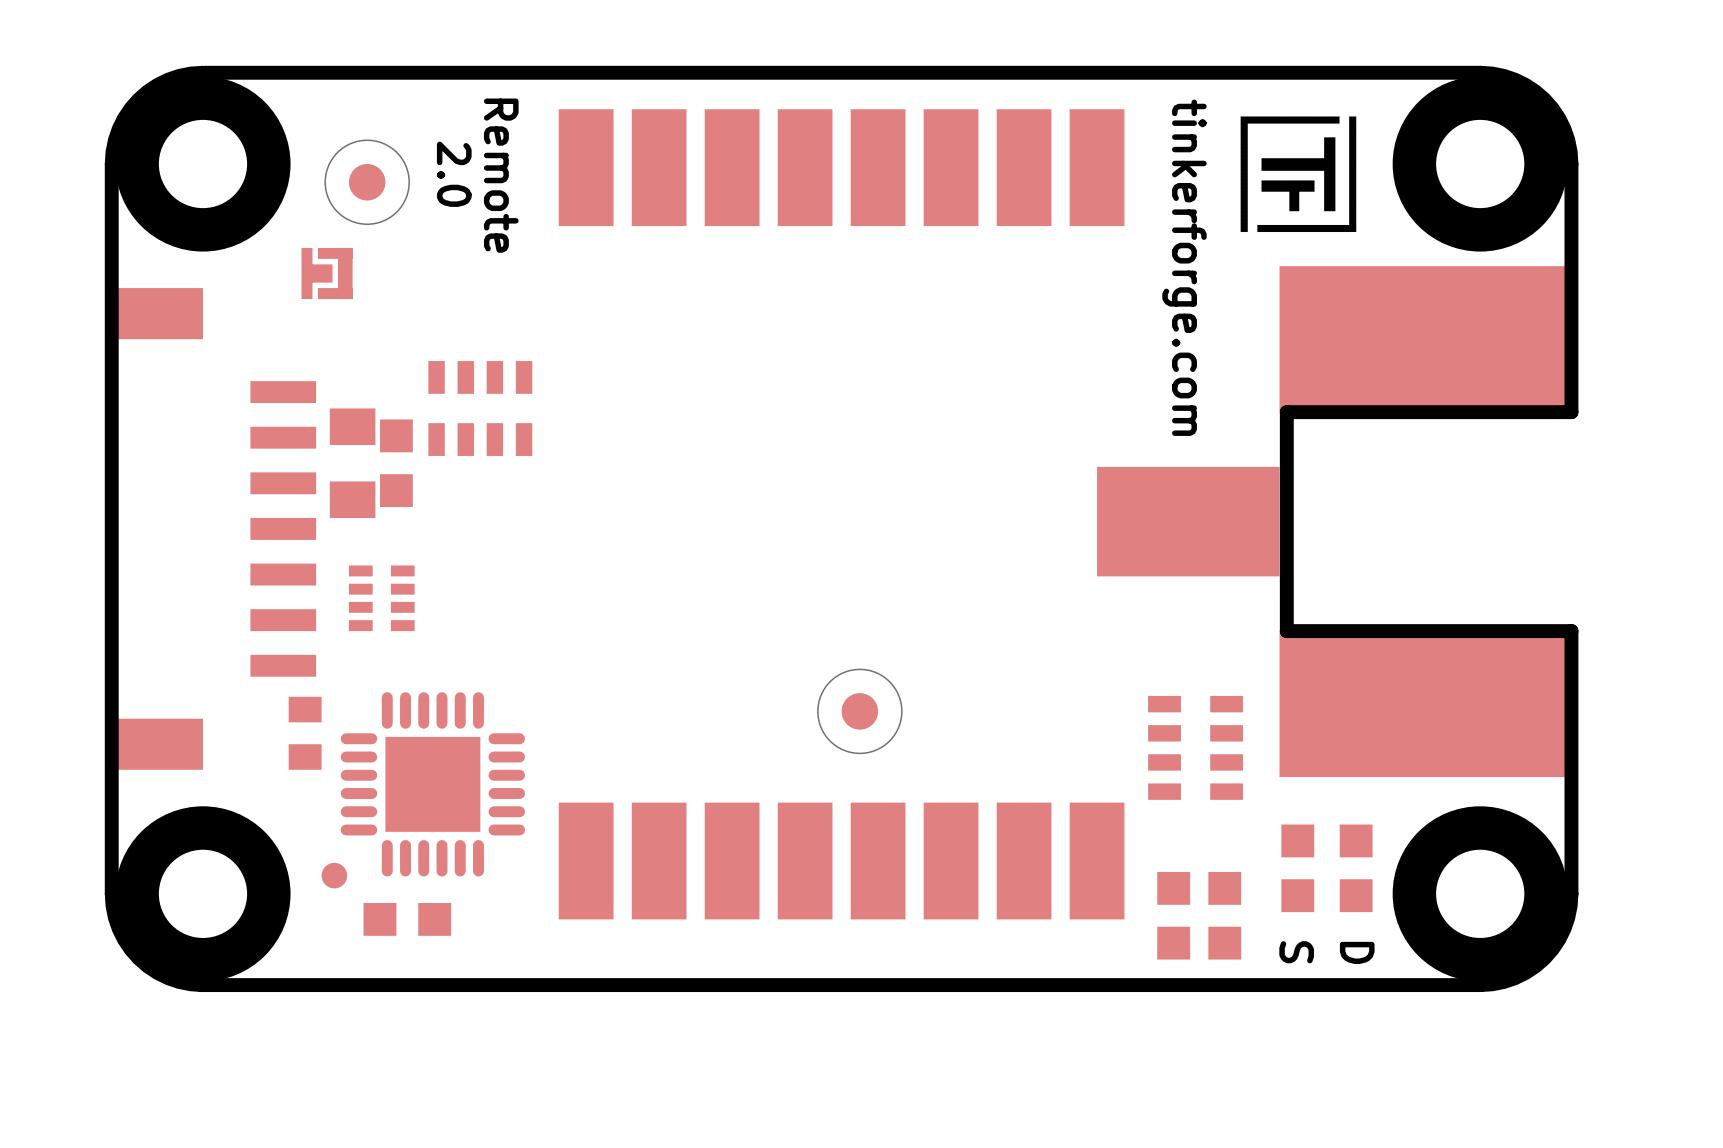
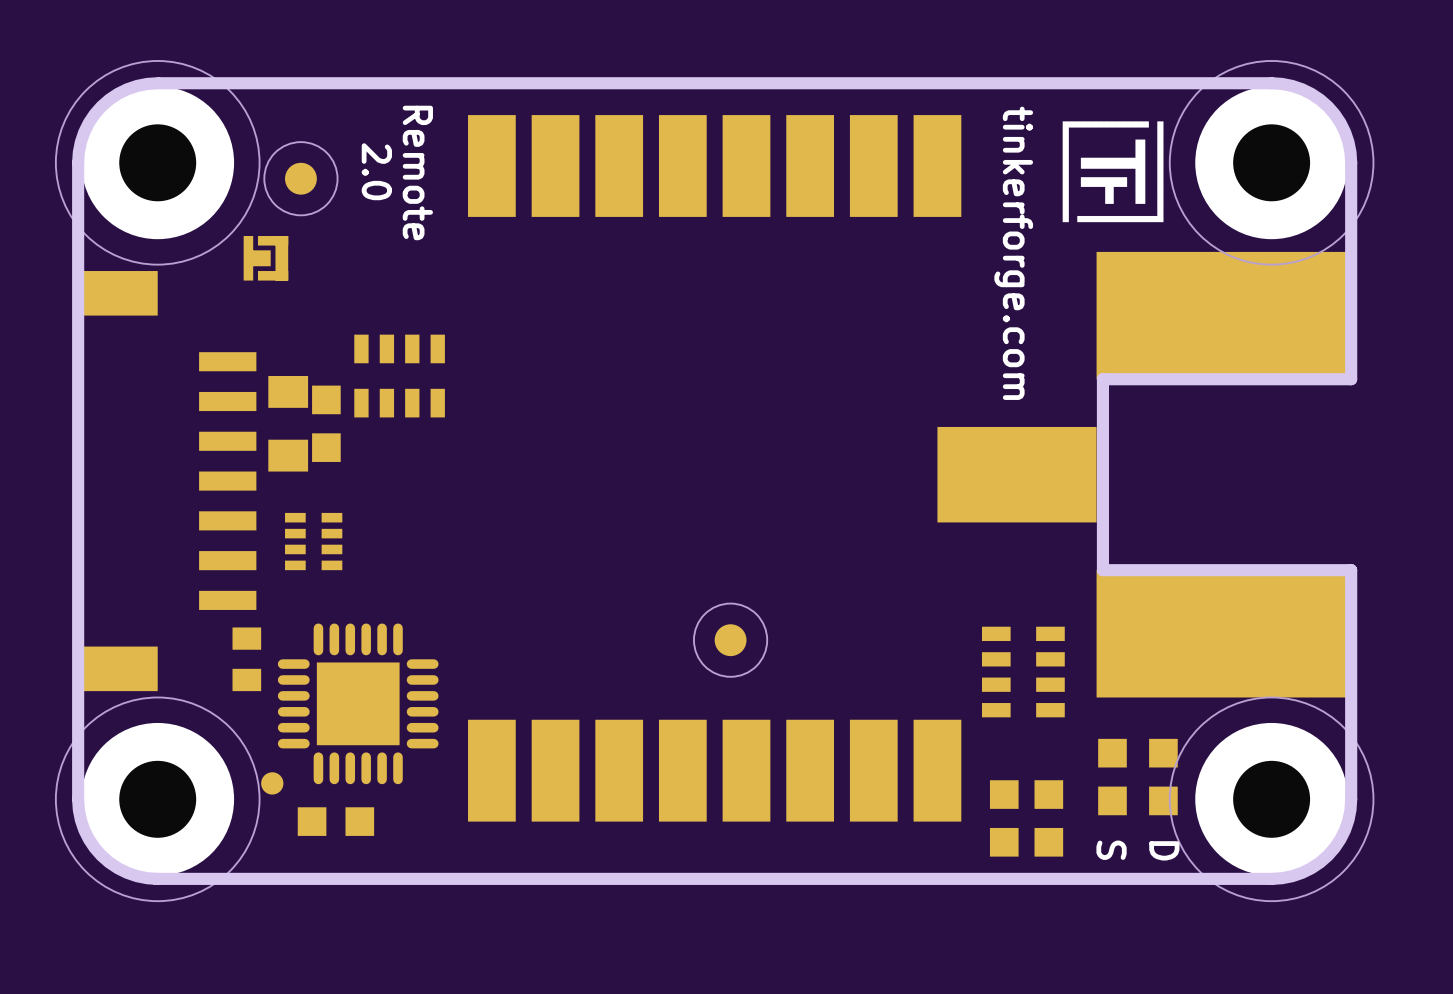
part footprint: [115, 76, 291, 252] -> [55, 60, 260, 265]
part footprint: [1392, 76, 1568, 252] -> [1169, 60, 1374, 265]
part footprint: [115, 806, 291, 982] -> [55, 697, 260, 902]
part footprint: [1392, 806, 1568, 982] -> [1169, 697, 1374, 902]

